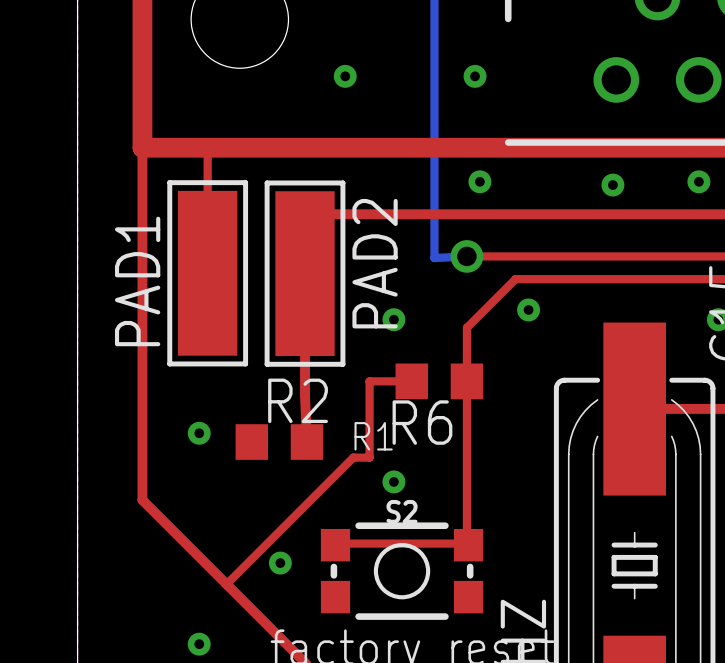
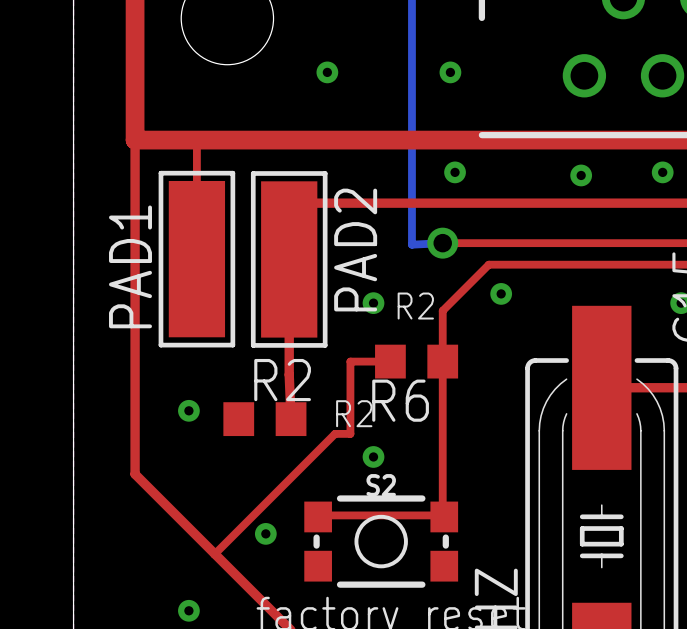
text: none -> R2 (415, 306)
text: R1 (373, 436) -> R2 (354, 413)

